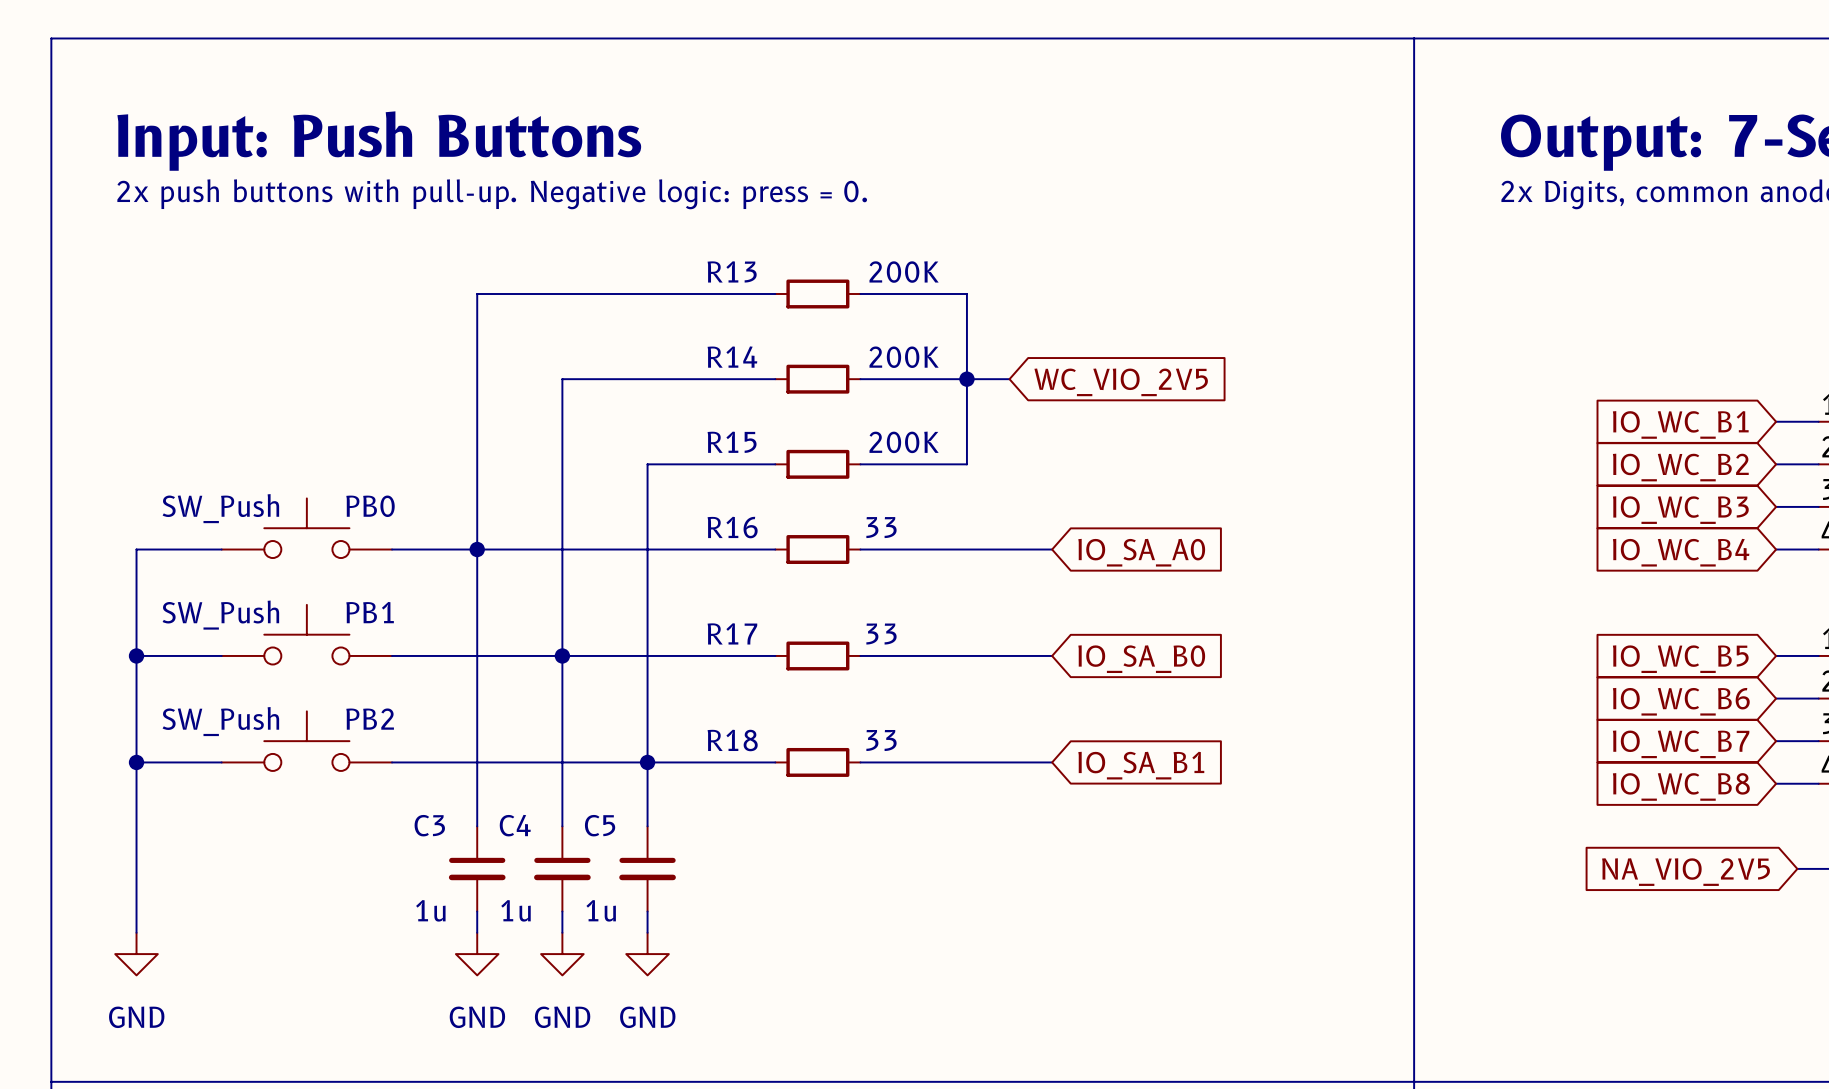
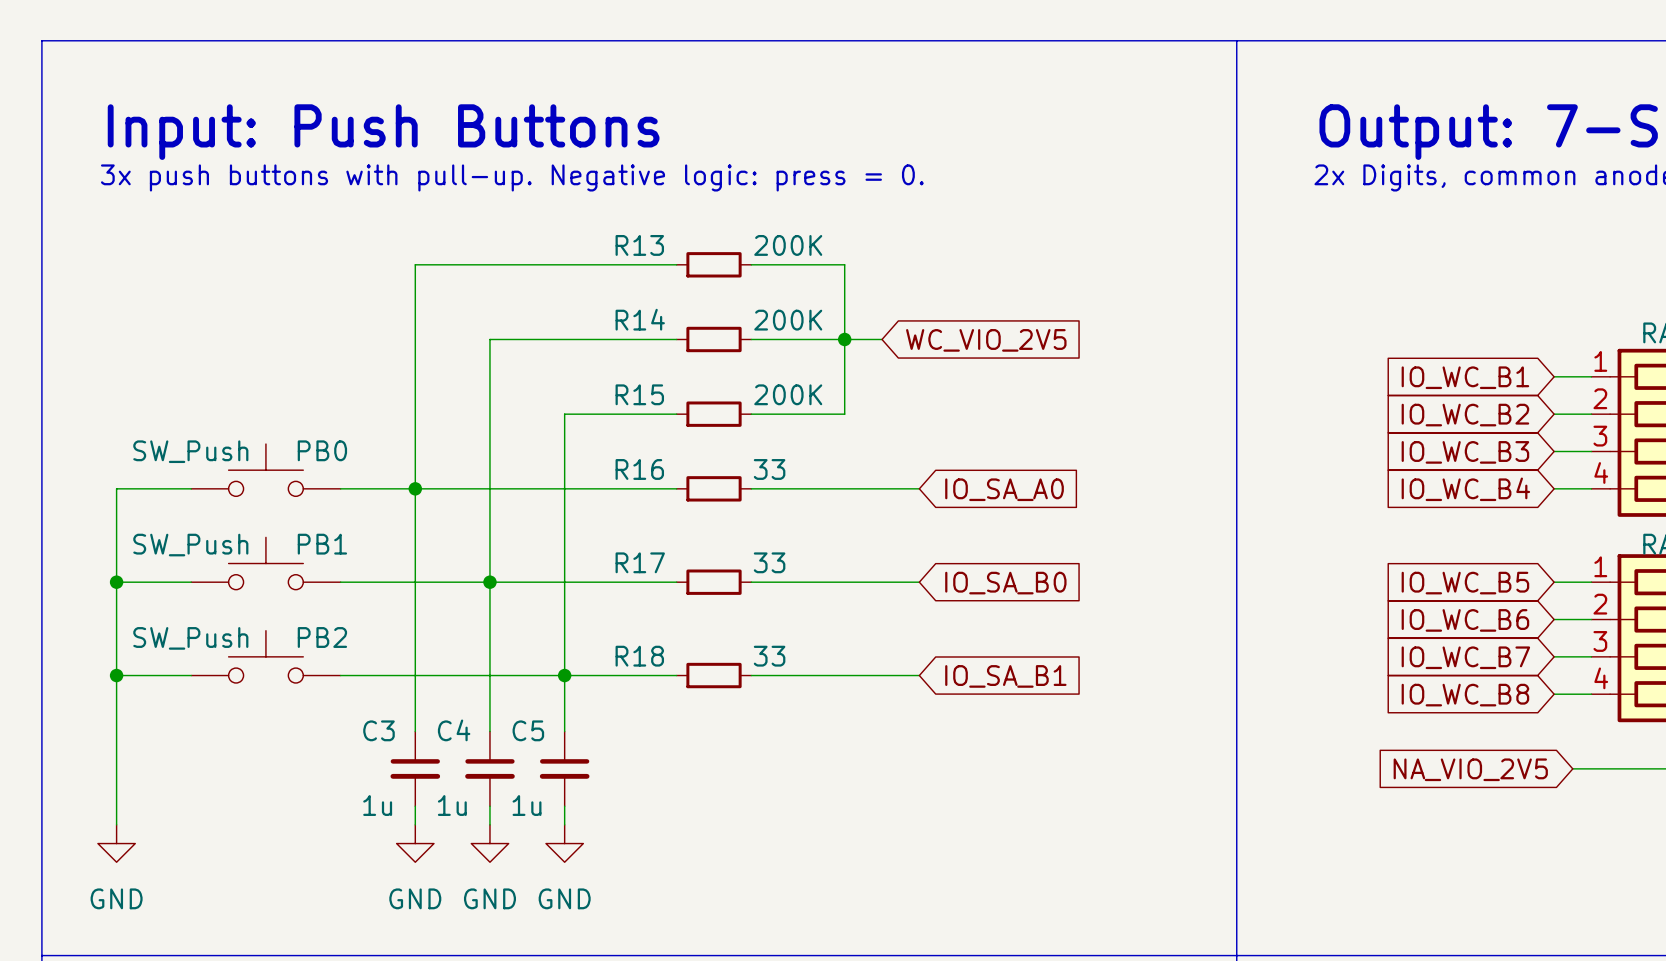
text: 2x push buttons with pull-up. Negative logic: press = 0. (492, 194) -> 3x push buttons with pull-up. Negative logic: press = 0. (512, 177)

